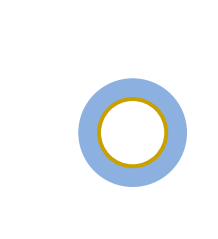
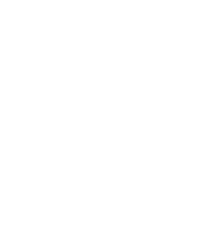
part: (132, 132) -> none

